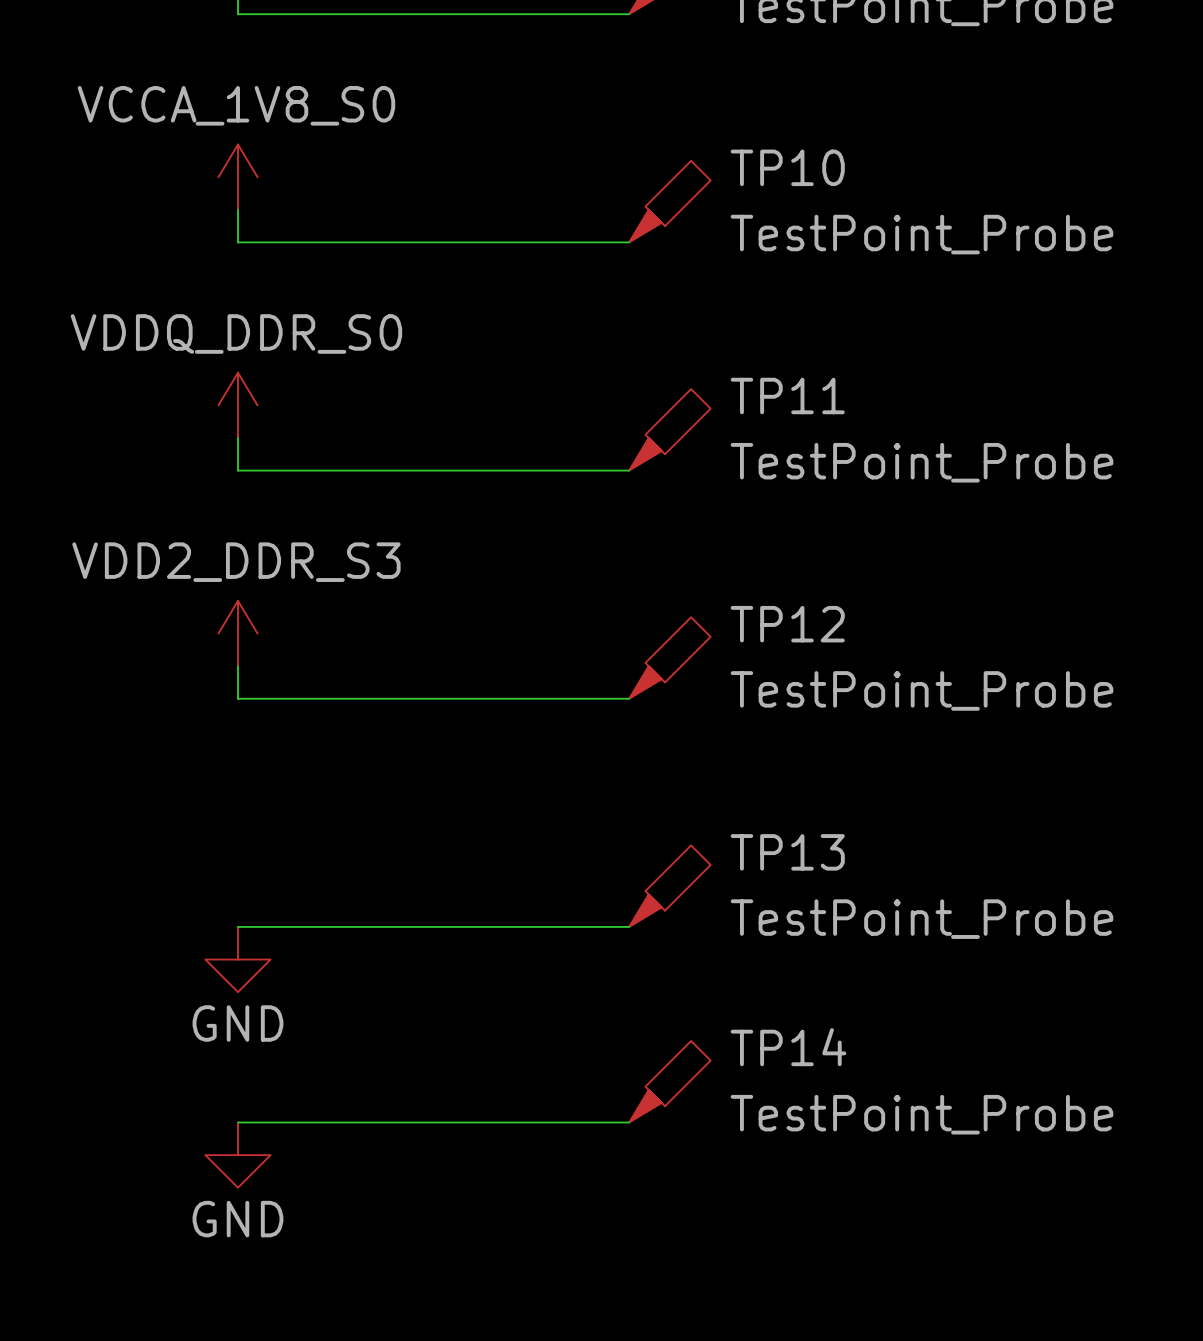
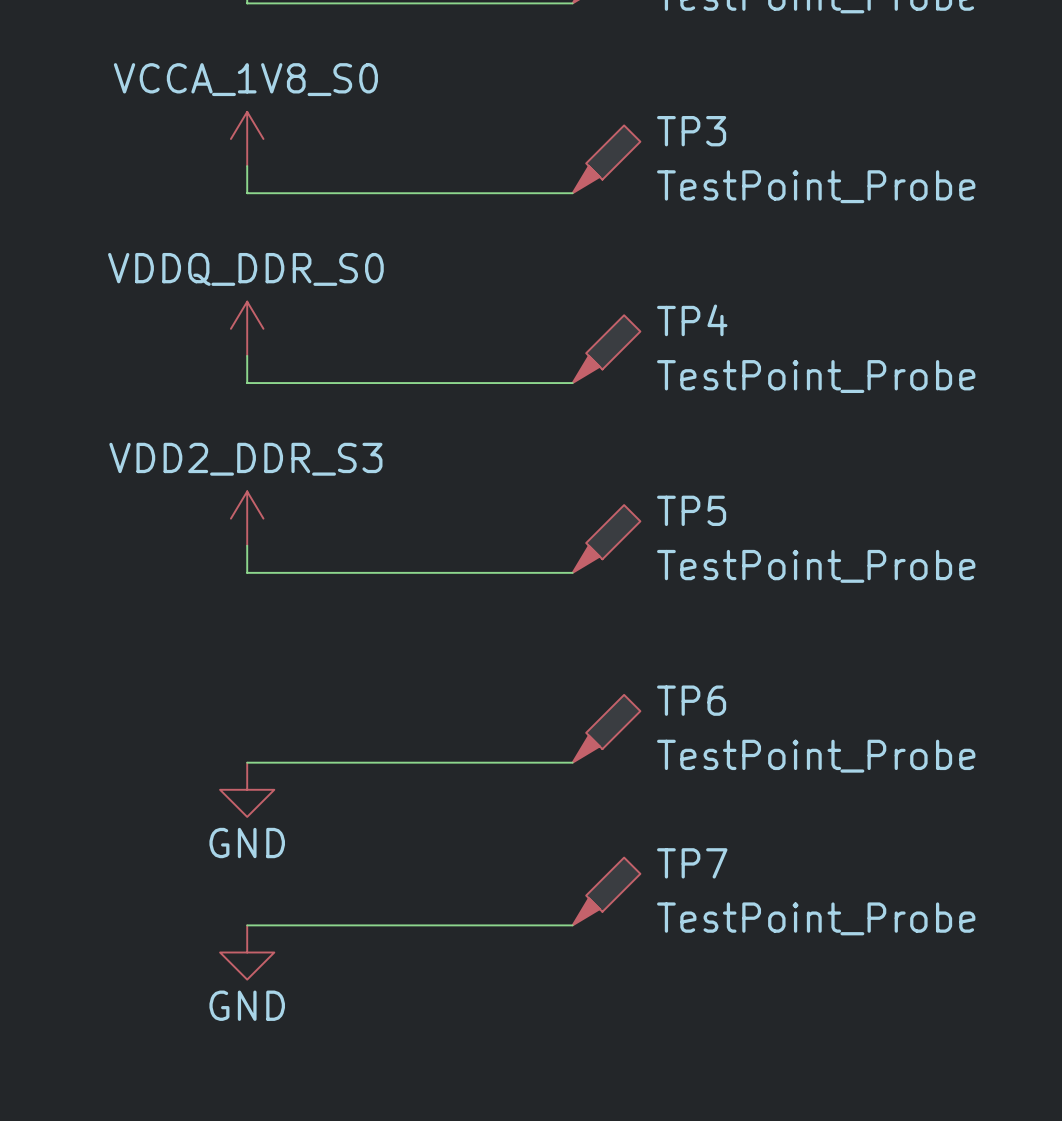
TP10 name: TP10 (787, 167) -> TP3 (691, 131)
TP11 name: TP11 (787, 396) -> TP4 (692, 320)
TP12 name: TP12 (787, 624) -> TP5 (691, 510)
TP13 name: TP13 (787, 852) -> TP6 (691, 700)
TP14 name: TP14 (788, 1047) -> TP7 (692, 863)

